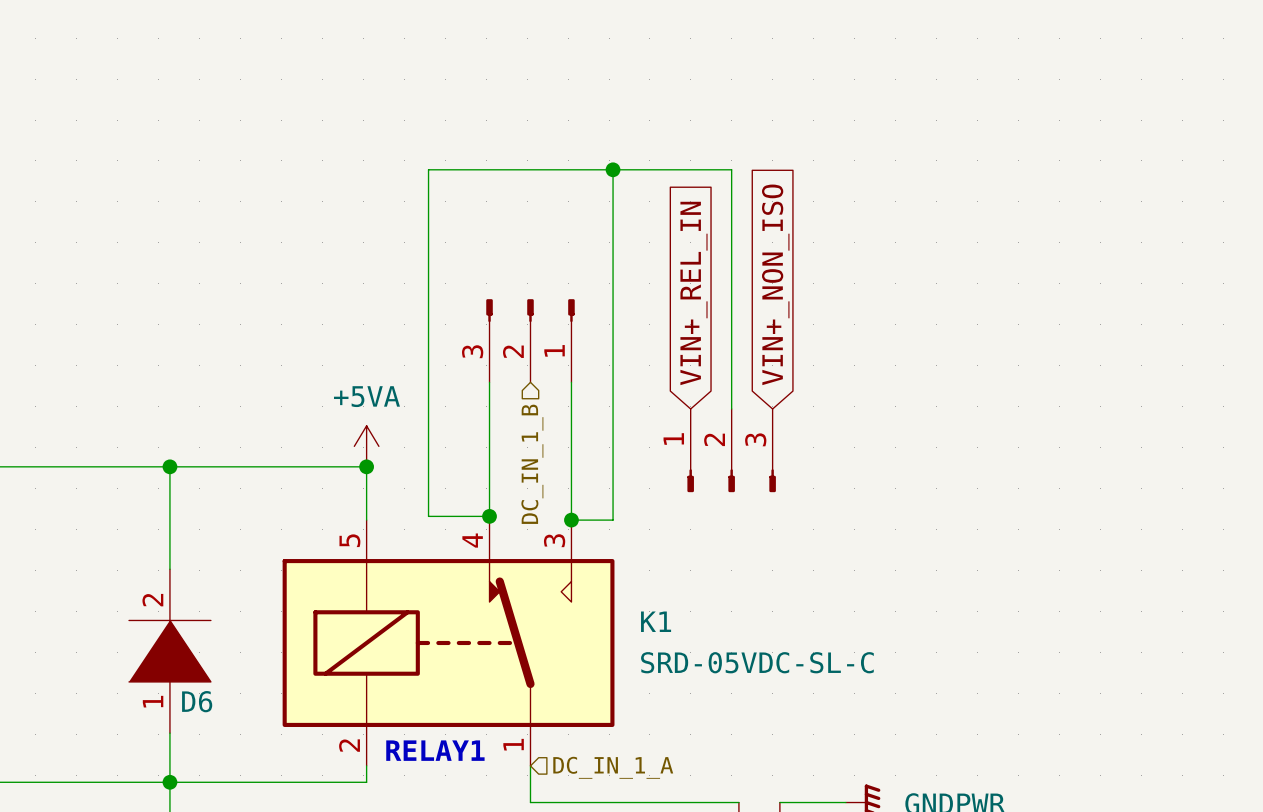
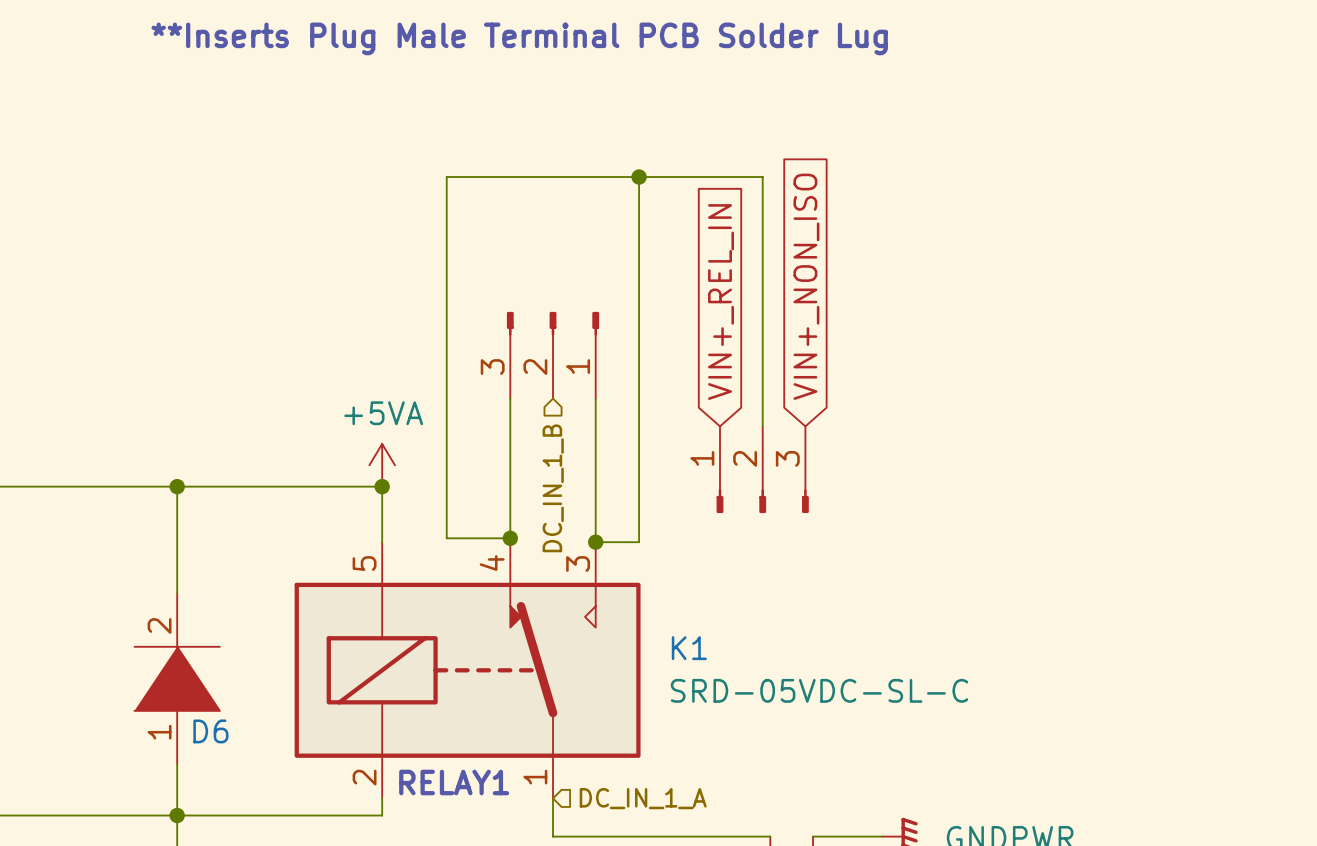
text: none -> **Inserts Plug Male Terminal PCB Solder Lug (519, 38)

